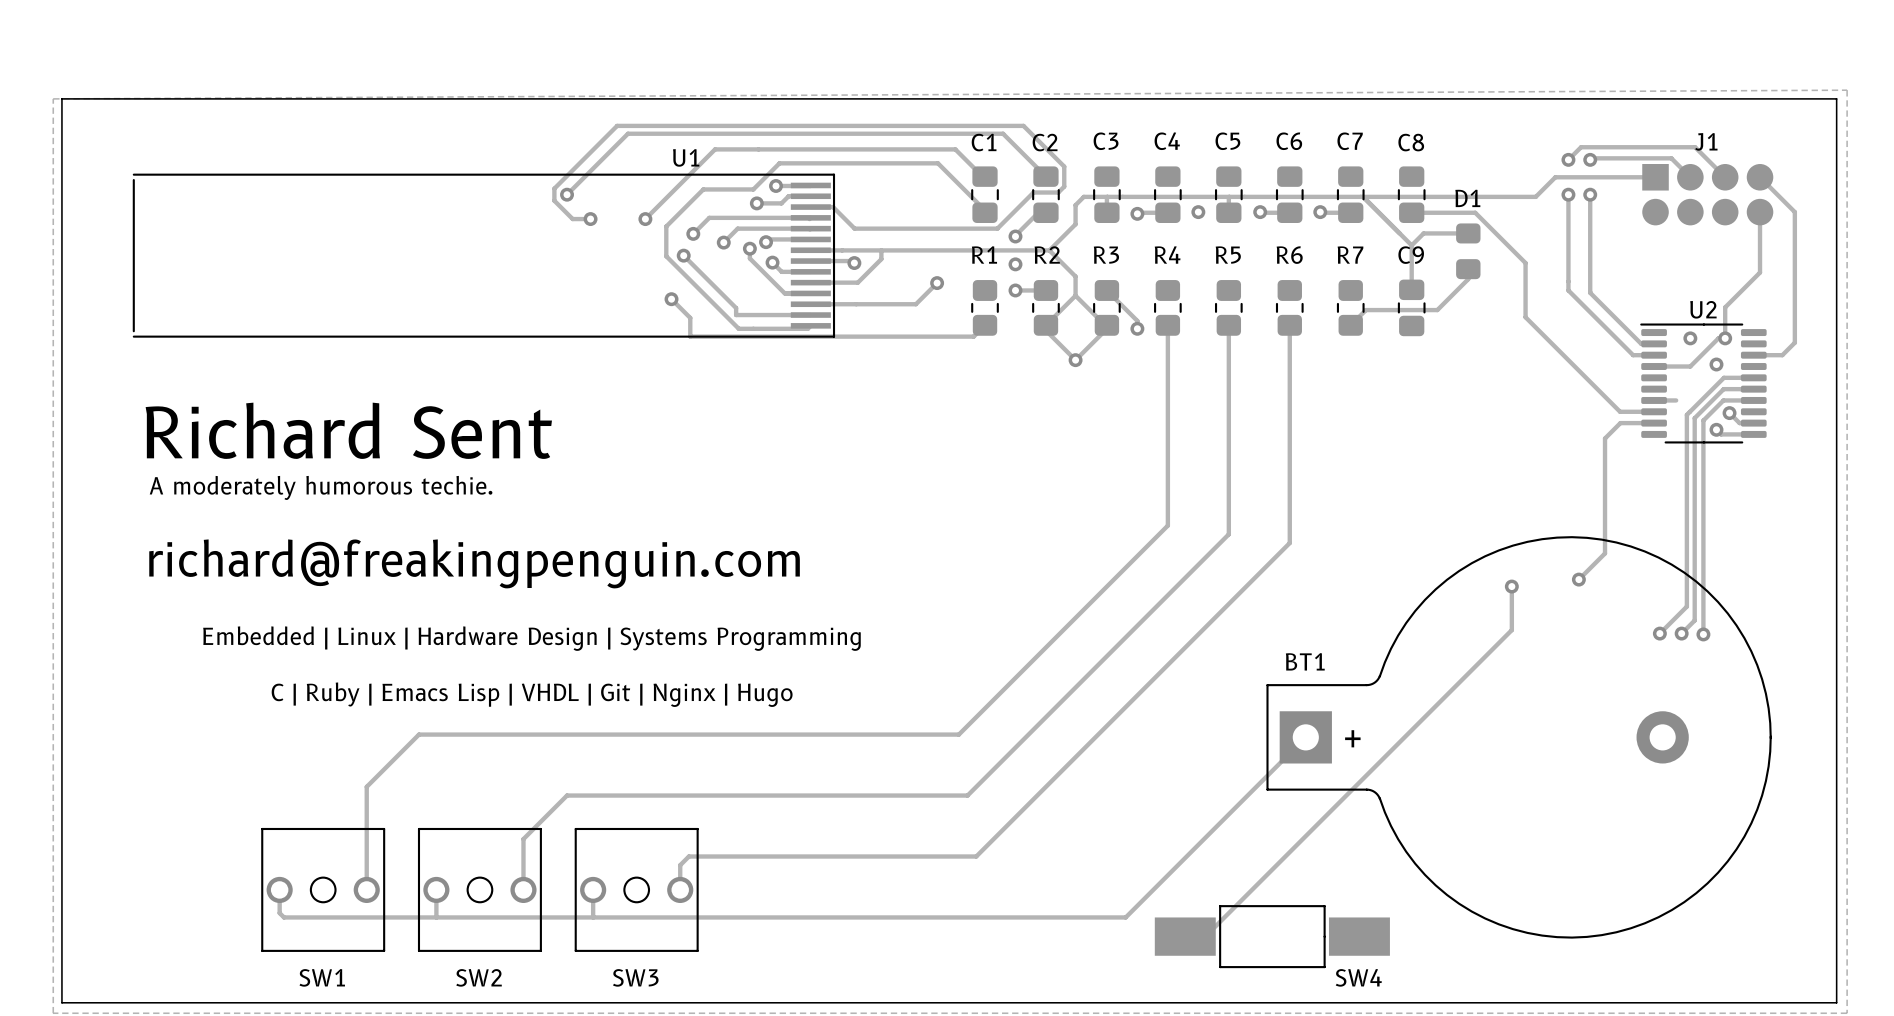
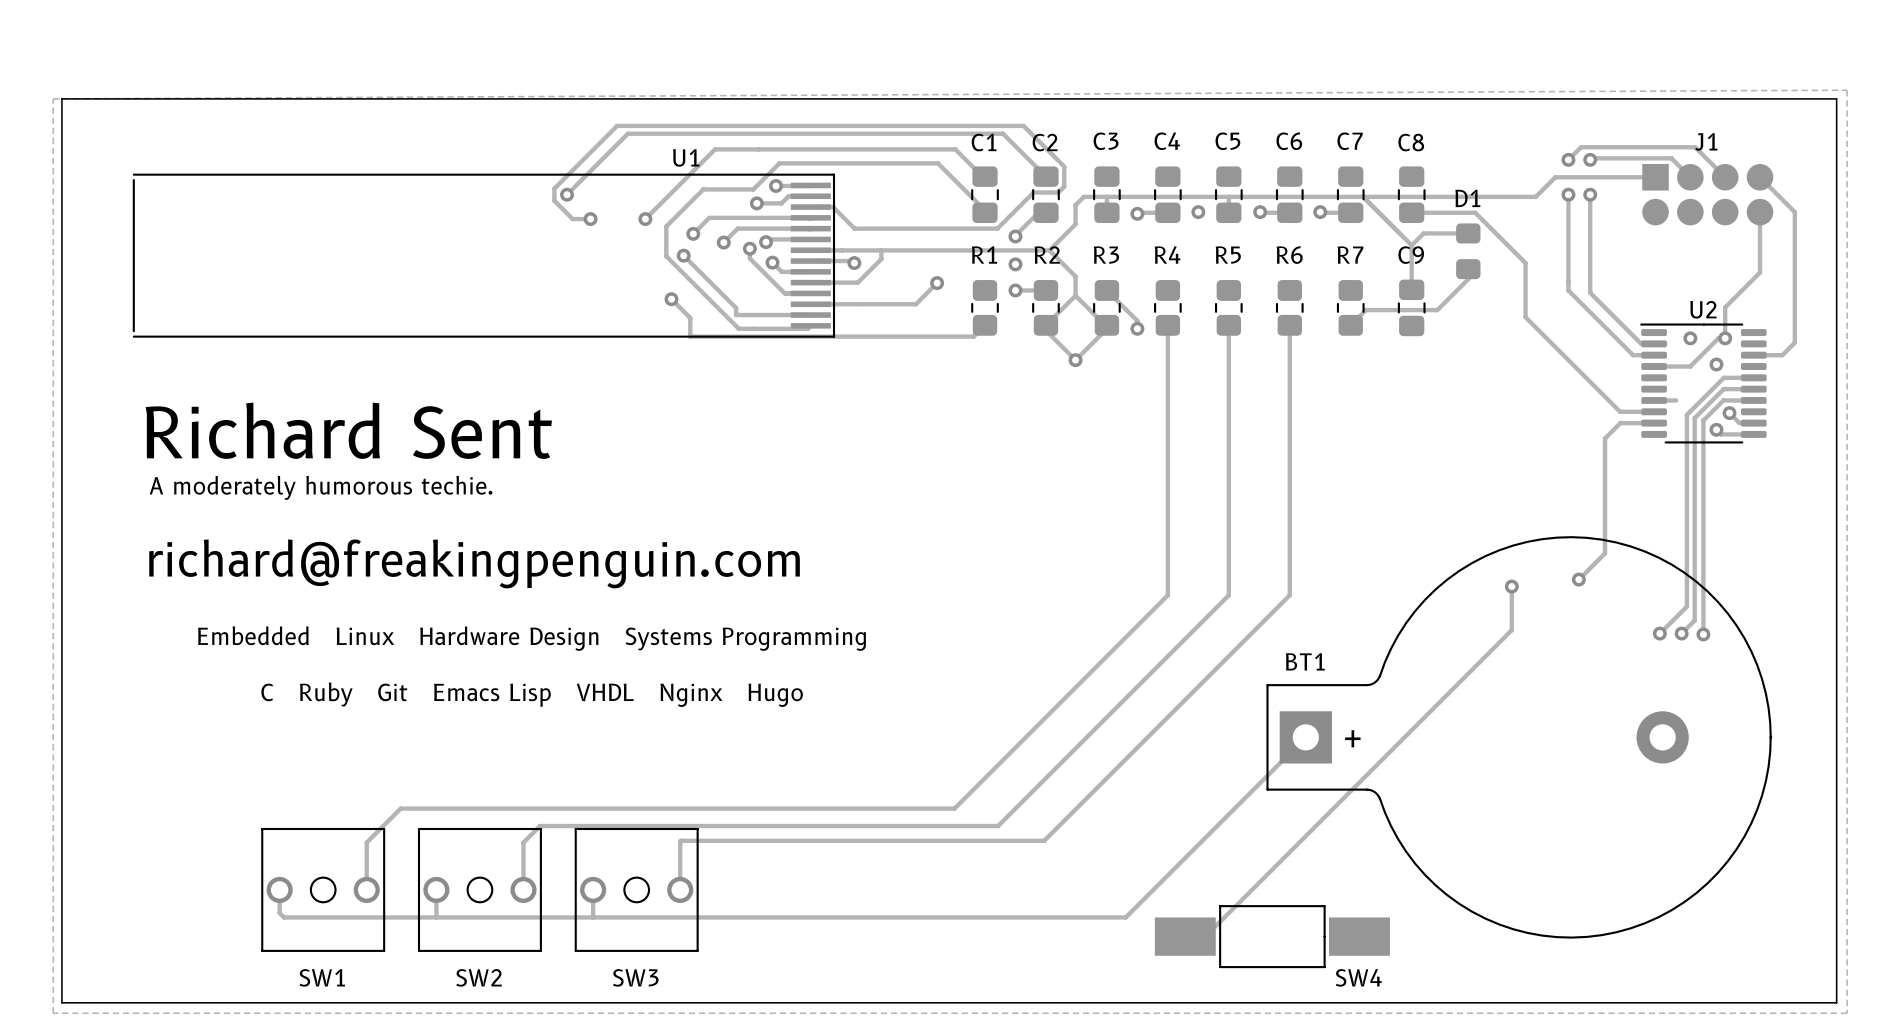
track: (1167, 525) (958, 734) (418, 734) (366, 786) (366, 842) -> none
track: (1228, 534) (1167, 595) -> (1167, 525) (1167, 595)
track: none -> (1228, 534) (1228, 595) (998, 826) (540, 826) (523, 842)
track: (1289, 543) (976, 856) (688, 856) (680, 865) -> (1289, 543) (1289, 595) (1044, 840) (680, 840)
text: Embedded | Linux | Hardware Design | Systems Programming (531, 638) -> Embedded Linux Hardware Design Systems Programming (531, 638)
text: C | Ruby | Emacs Lisp | VHDL | Git | Nginx | Hugo (532, 694) -> C Ruby Git Emacs Lisp VHDL Nginx Hugo (532, 694)
track: (967, 795) (567, 795) (523, 839) (523, 842) -> (967, 795) (954, 808) (400, 808) (366, 842)
track: none -> (681, 840) (680, 842) (680, 865)

